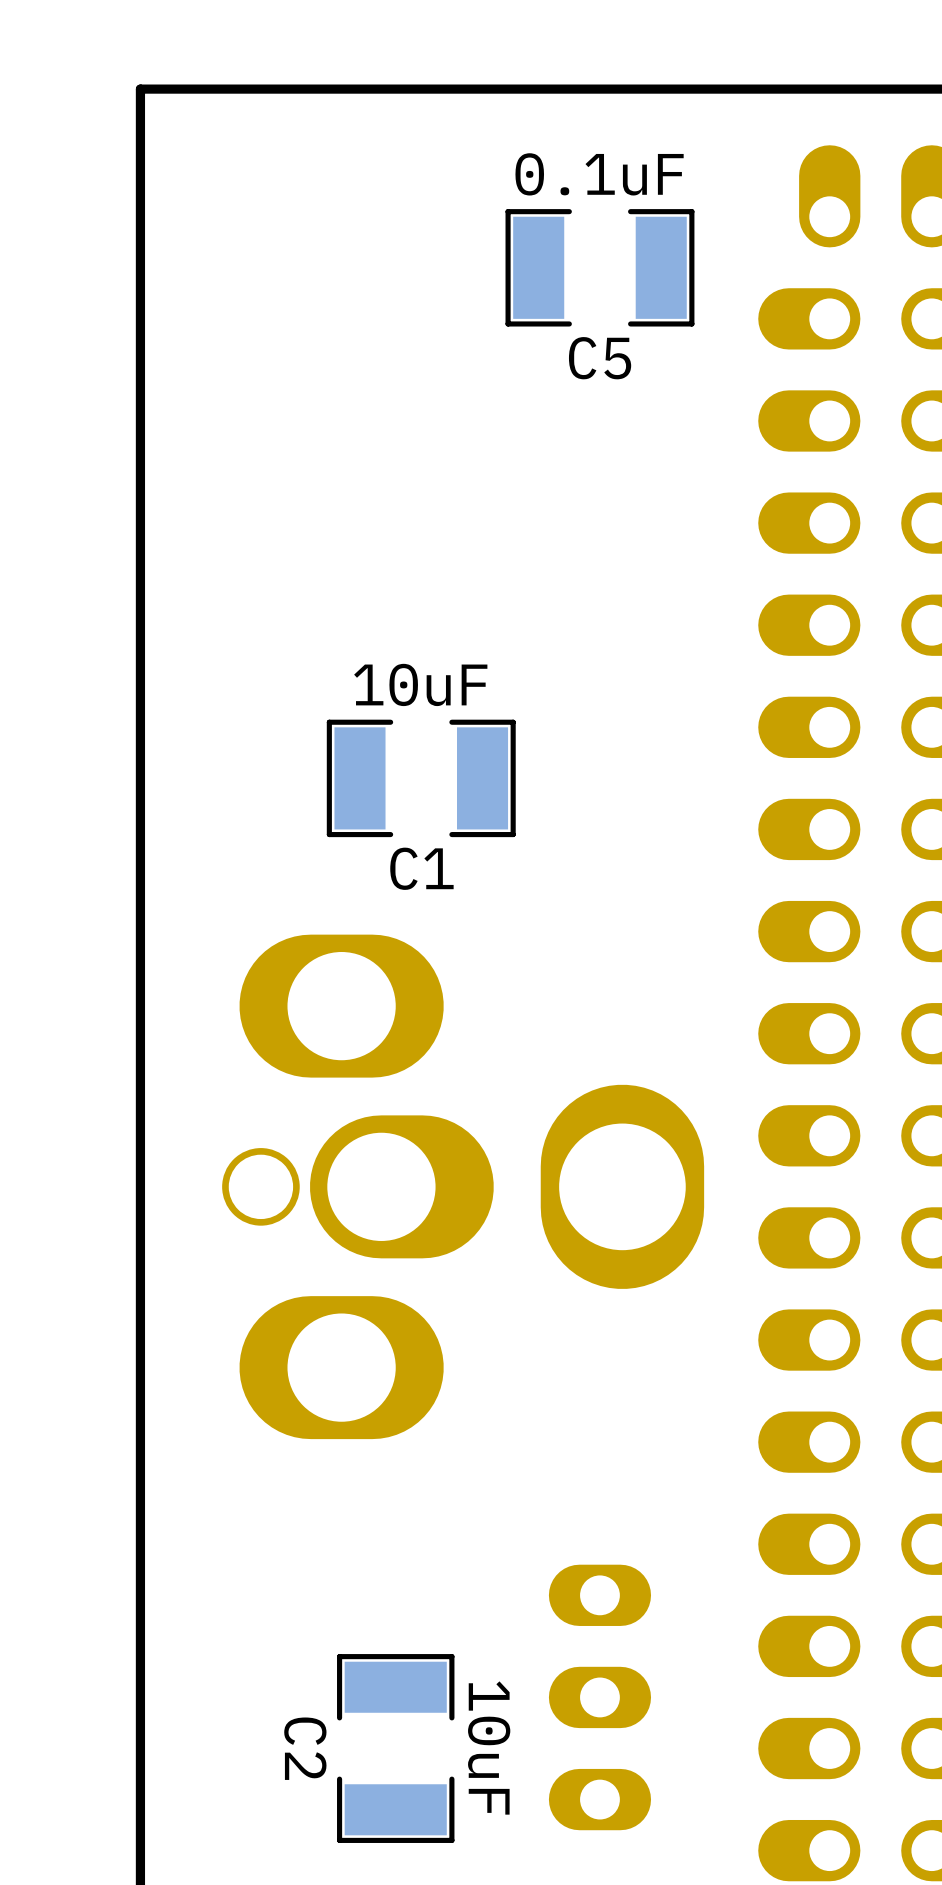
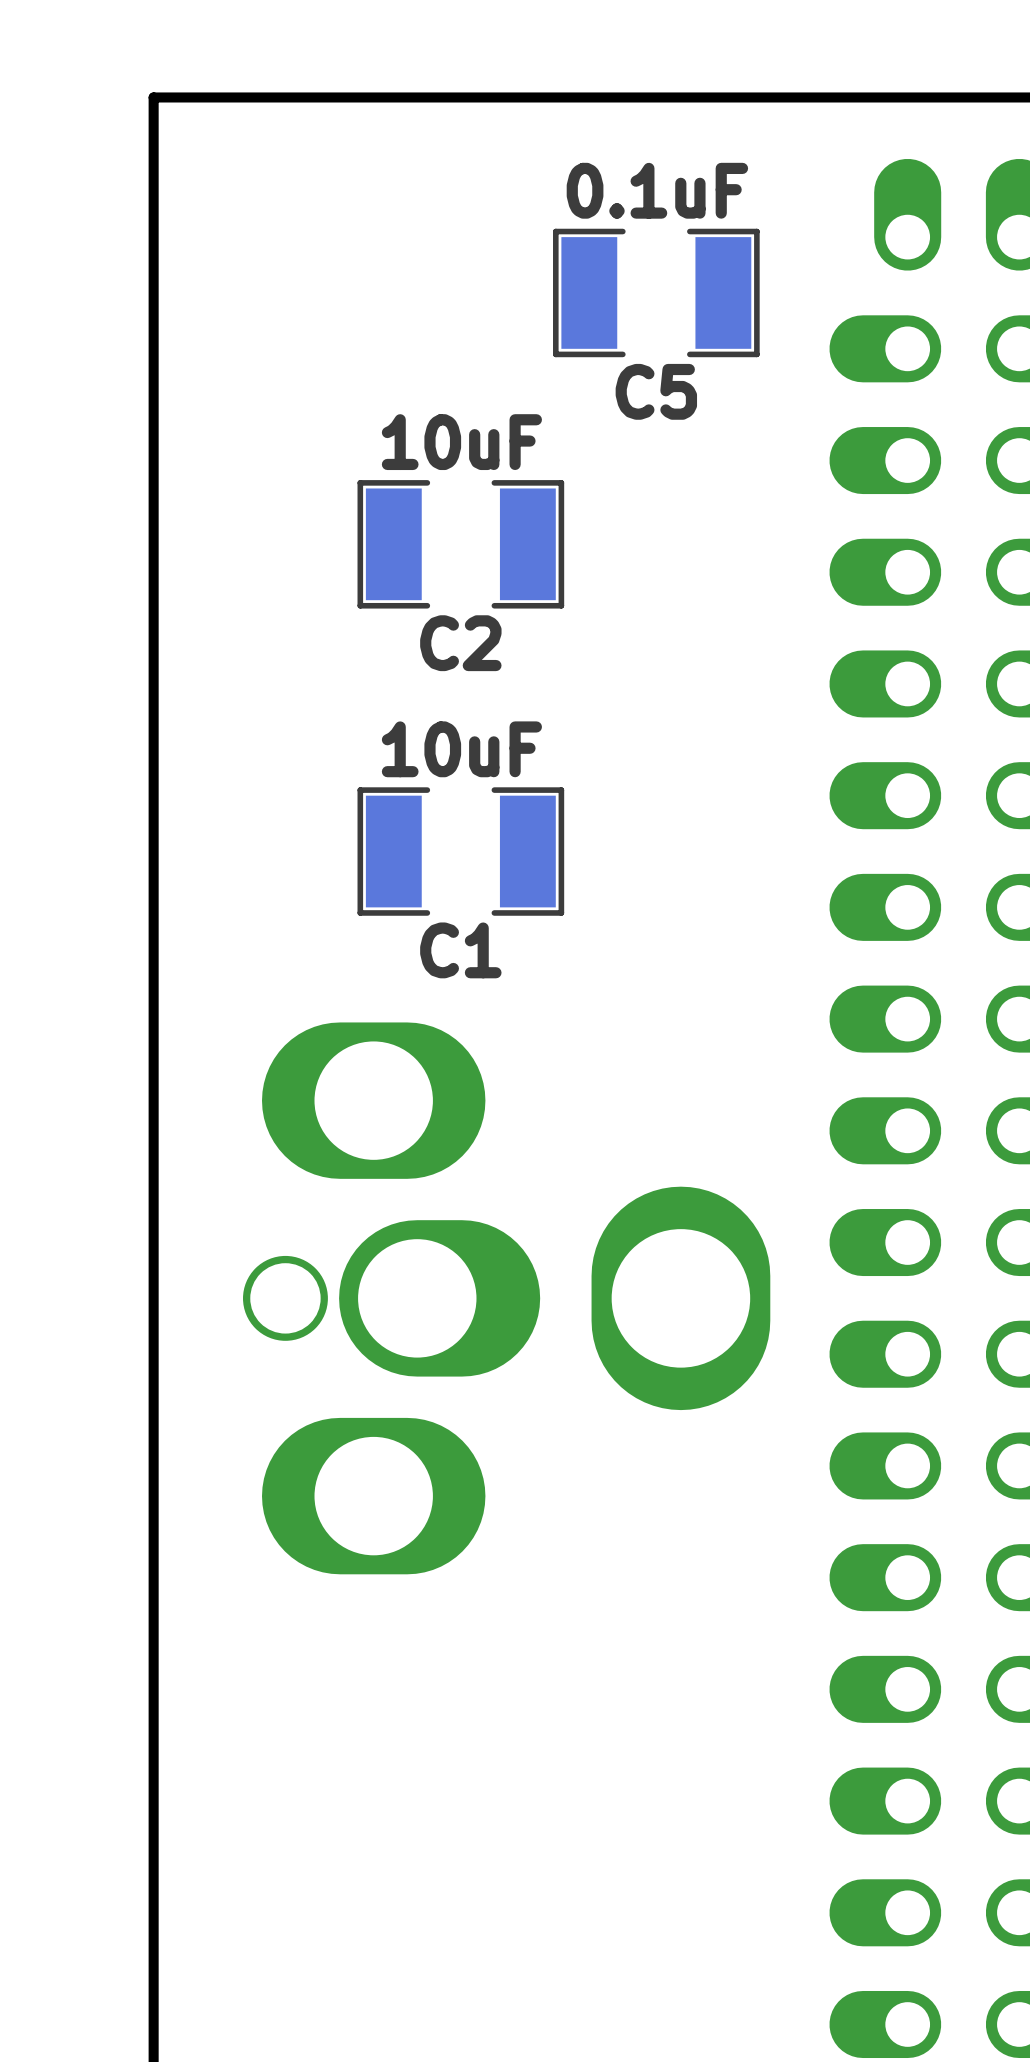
part: (599, 1697) -> none
C2 name position: C2 (305, 1748) -> C2 (460, 643)
C2 rotation: 0° (395, 1748) -> 90° clockwise (460, 544)
C2 position: (395, 1748) -> (460, 544)
C2 value position: 10uF (489, 1748) -> 10uF (461, 442)

